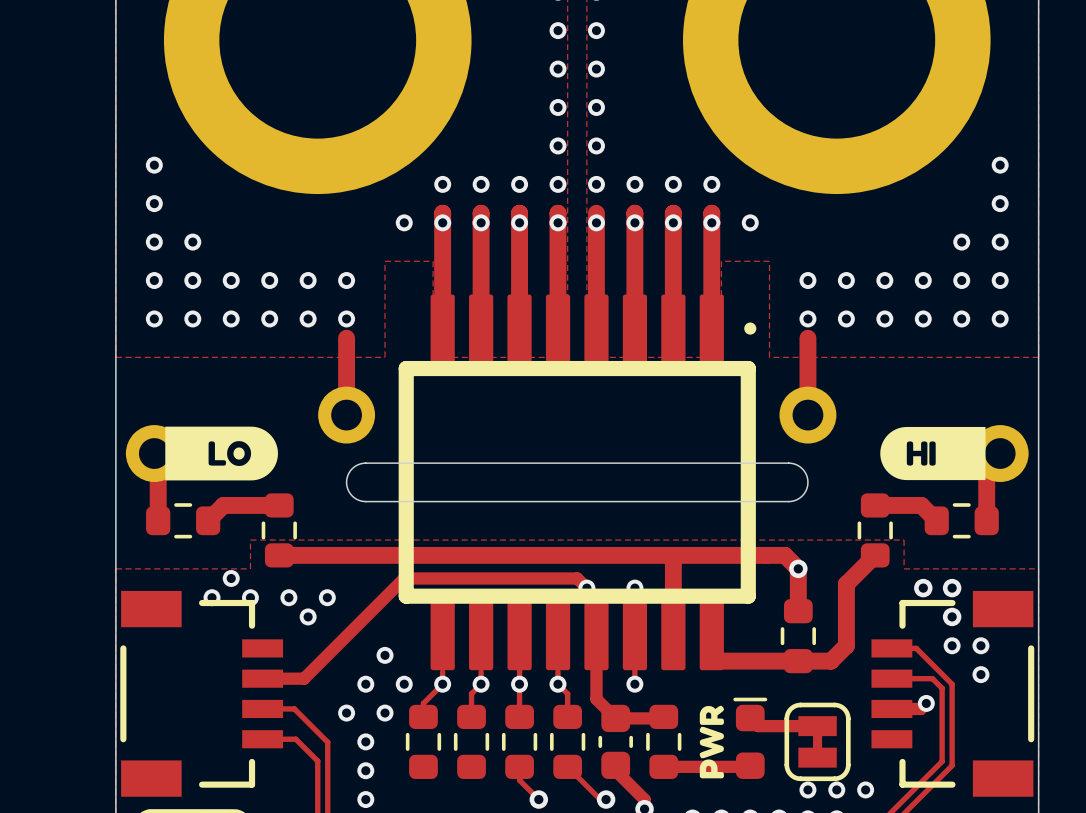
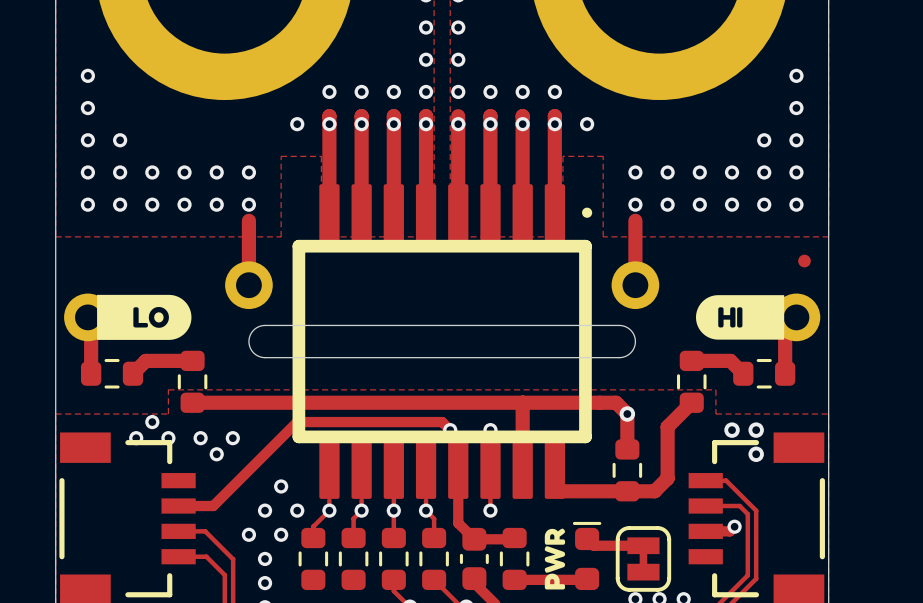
part: none -> (804, 261)
via: (952, 645) -> none
via: (980, 645) -> none
via: (980, 674) -> none

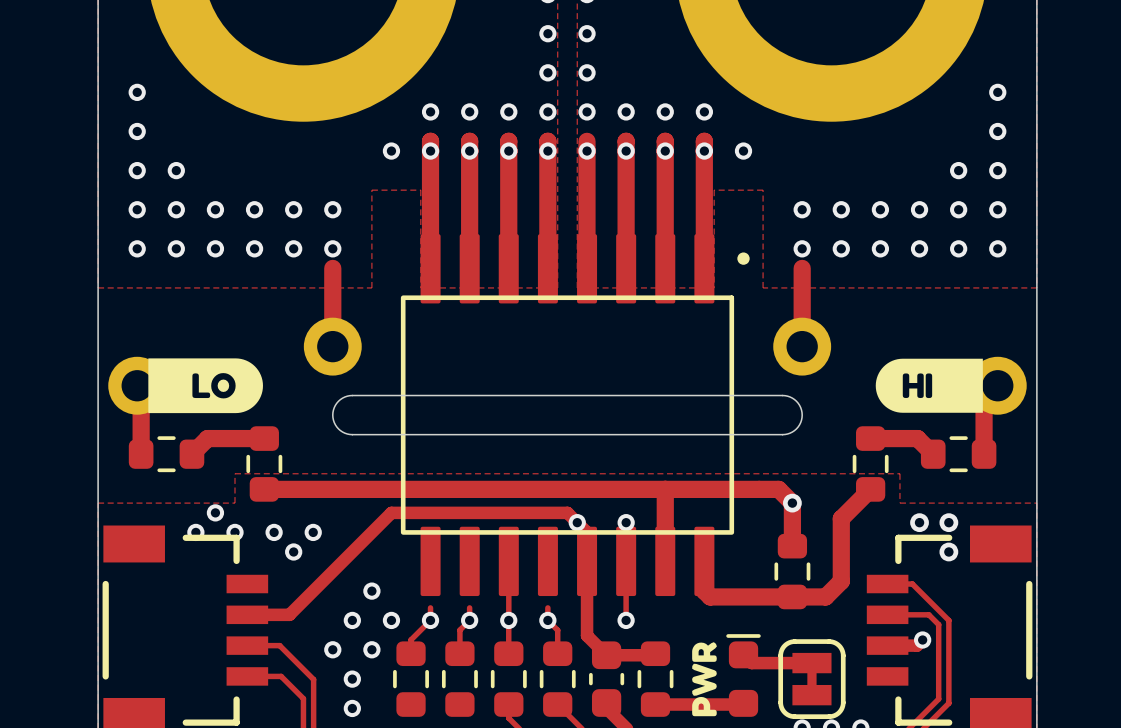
part footprint: [248, 184, 637, 499] -> [332, 234, 803, 597]
part: (804, 261) -> none

